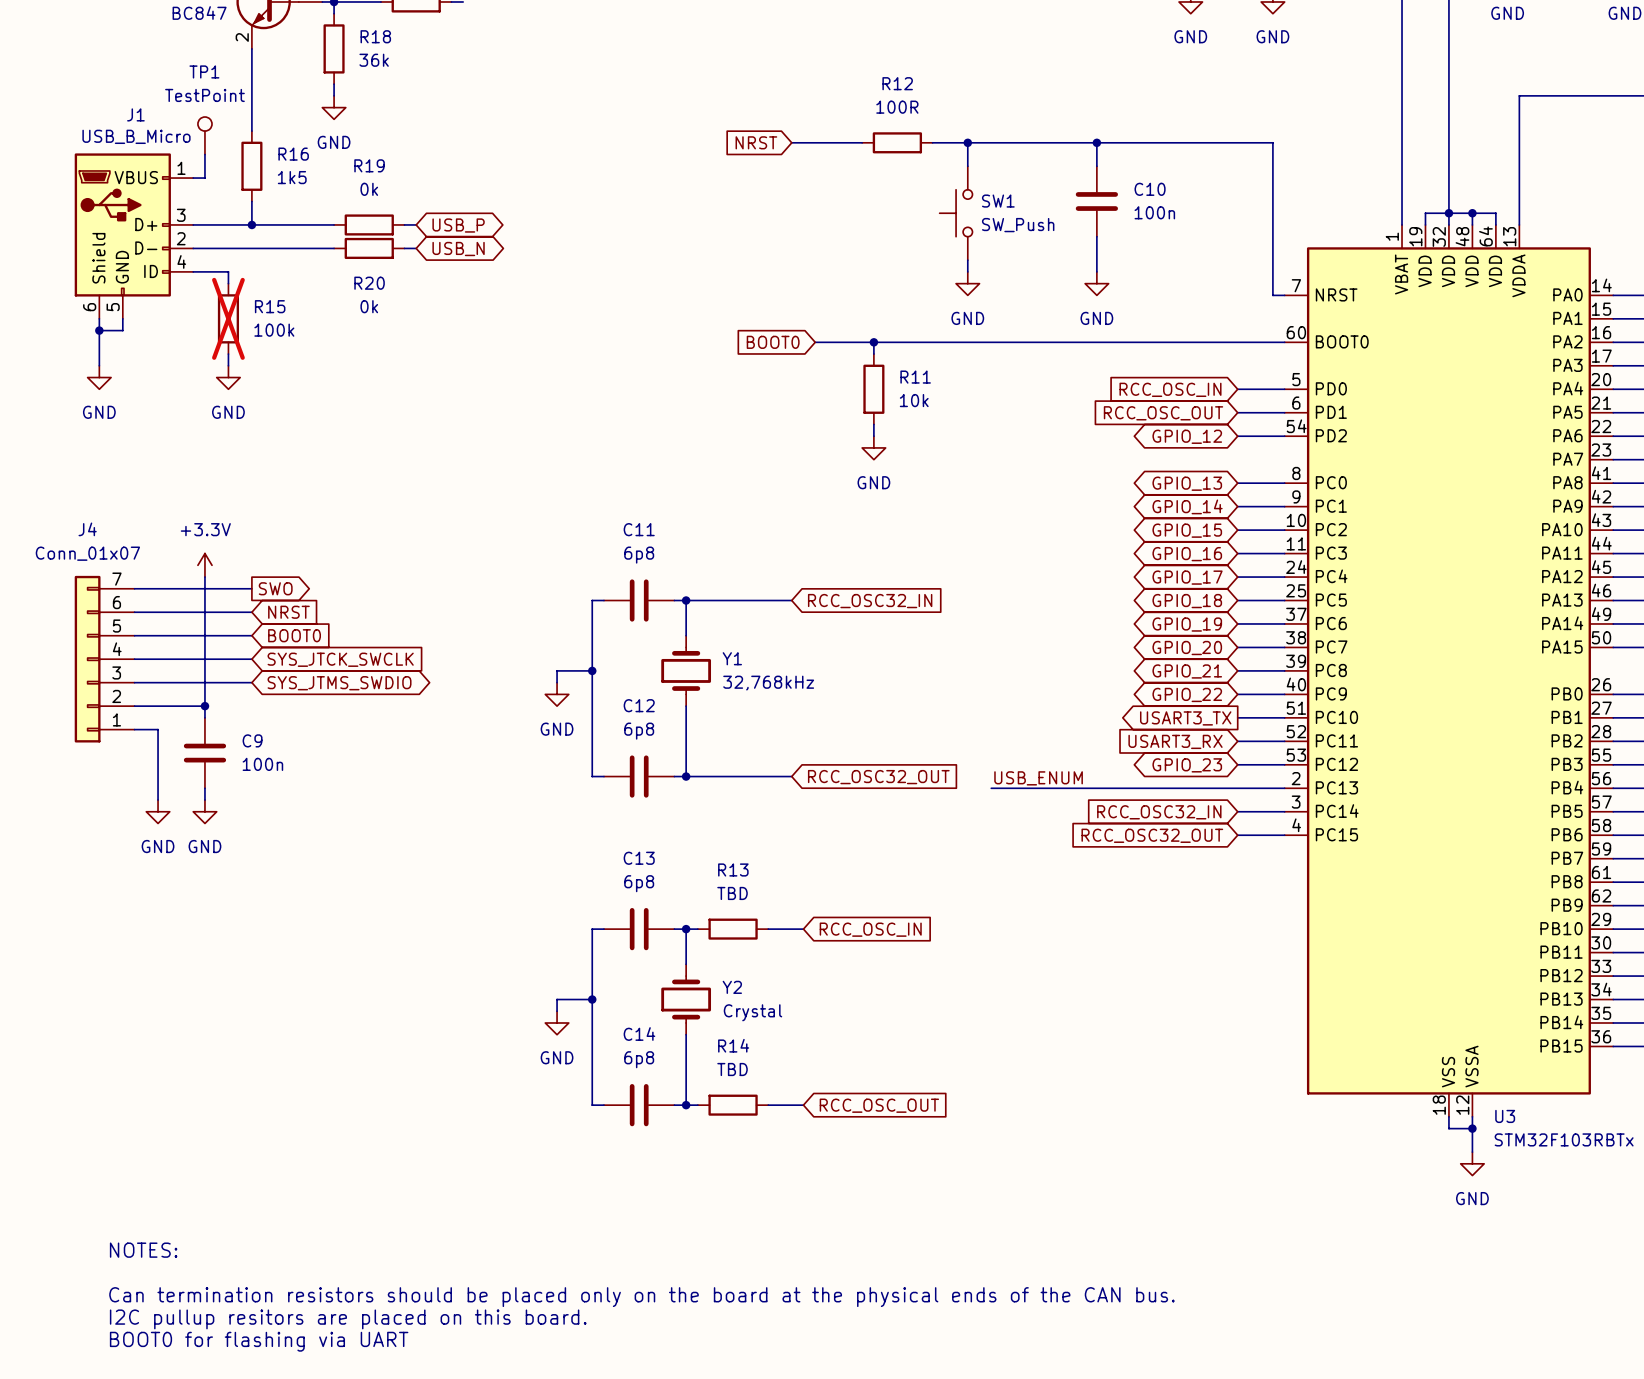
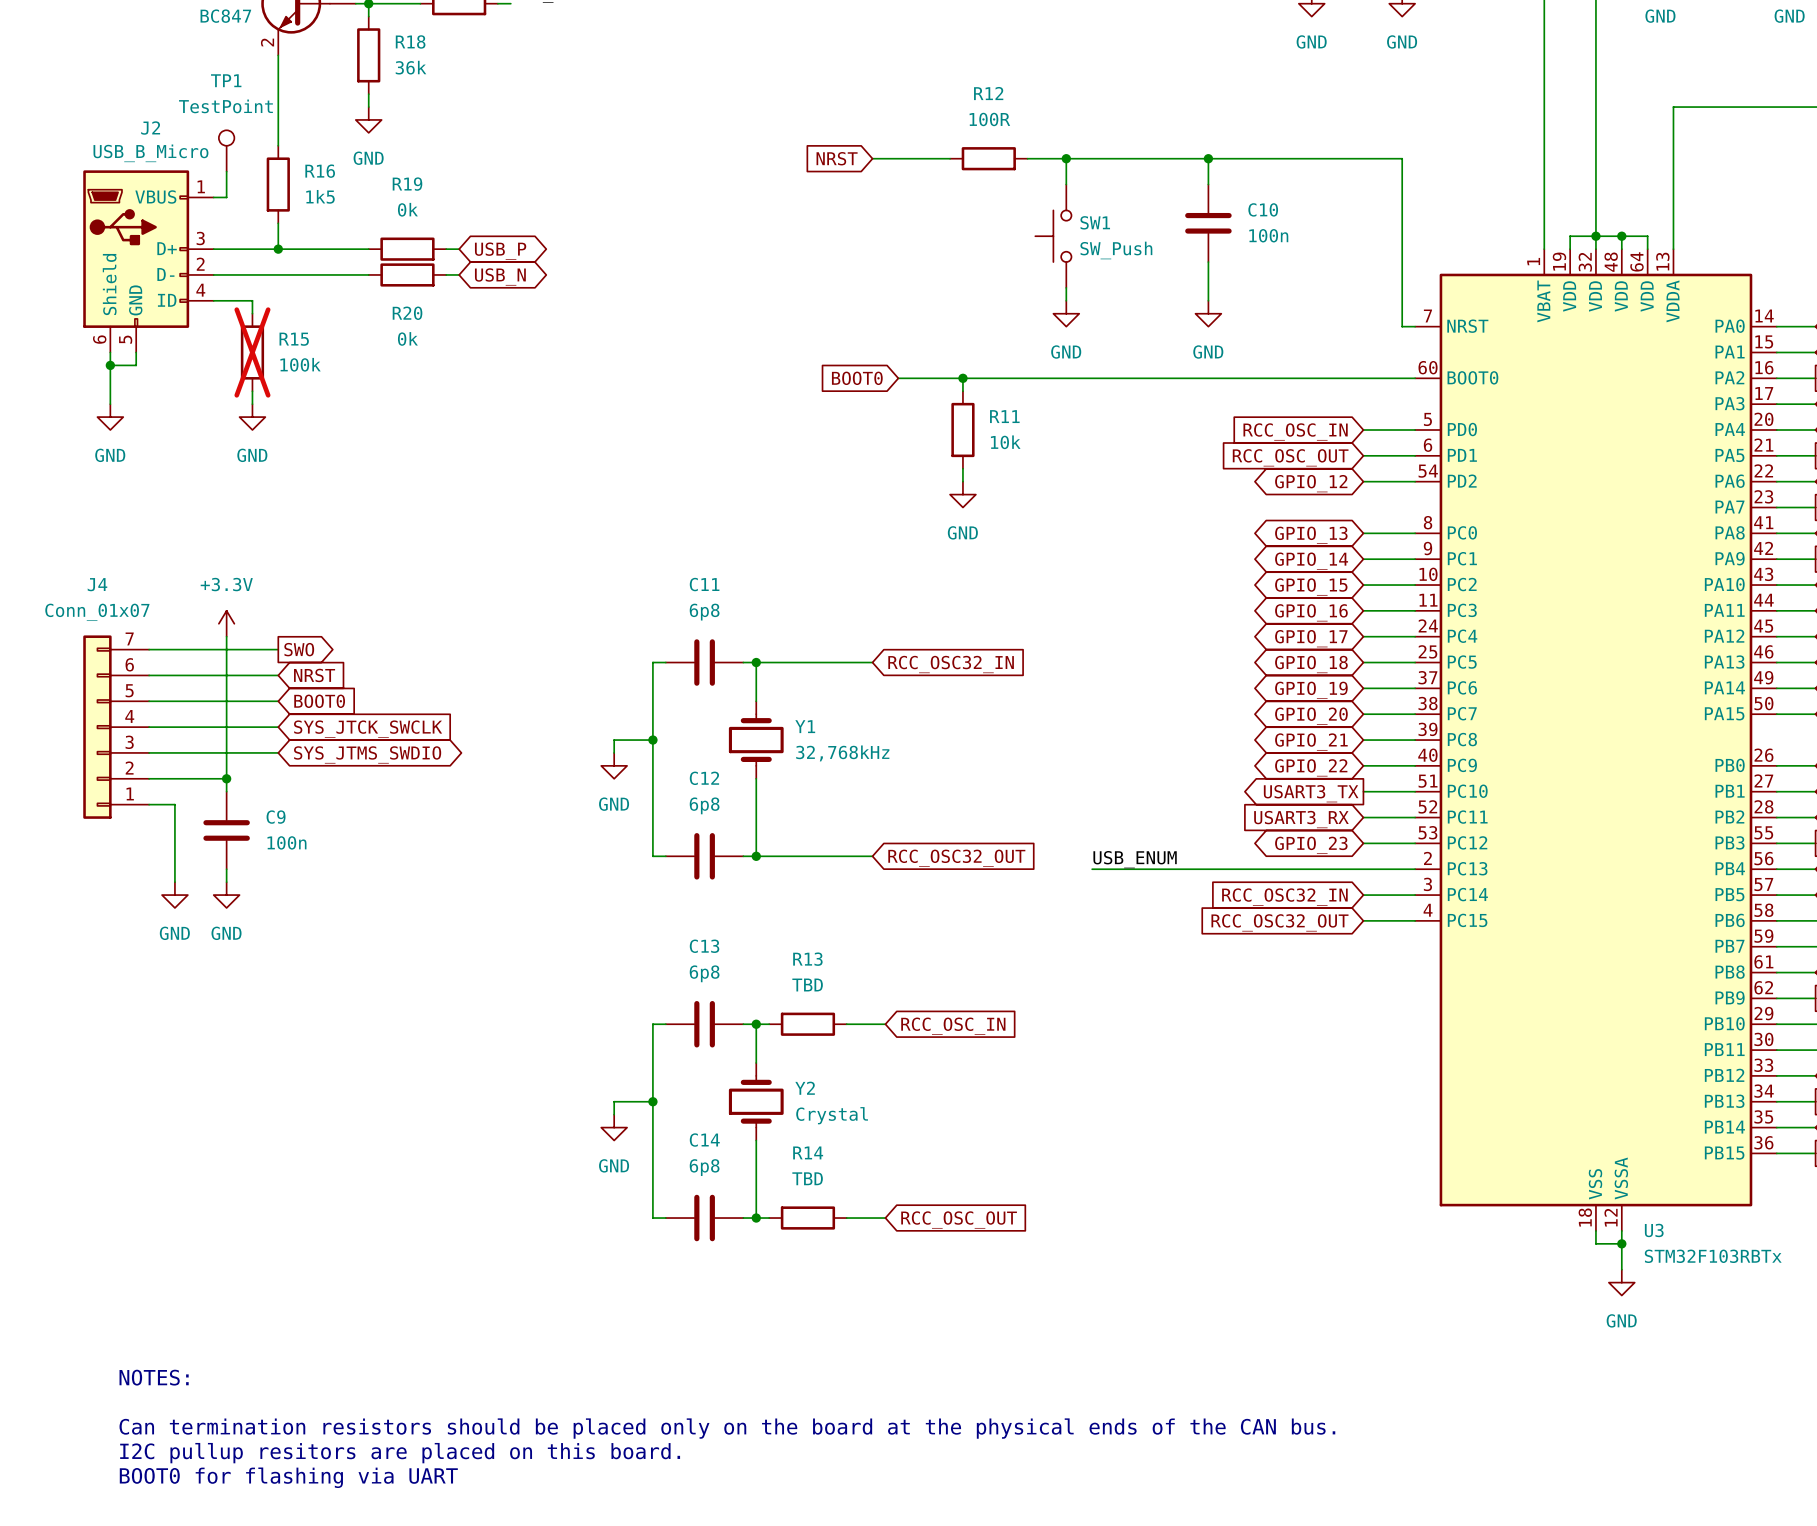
J1 name: J1 (135, 114) -> J2 (150, 128)

